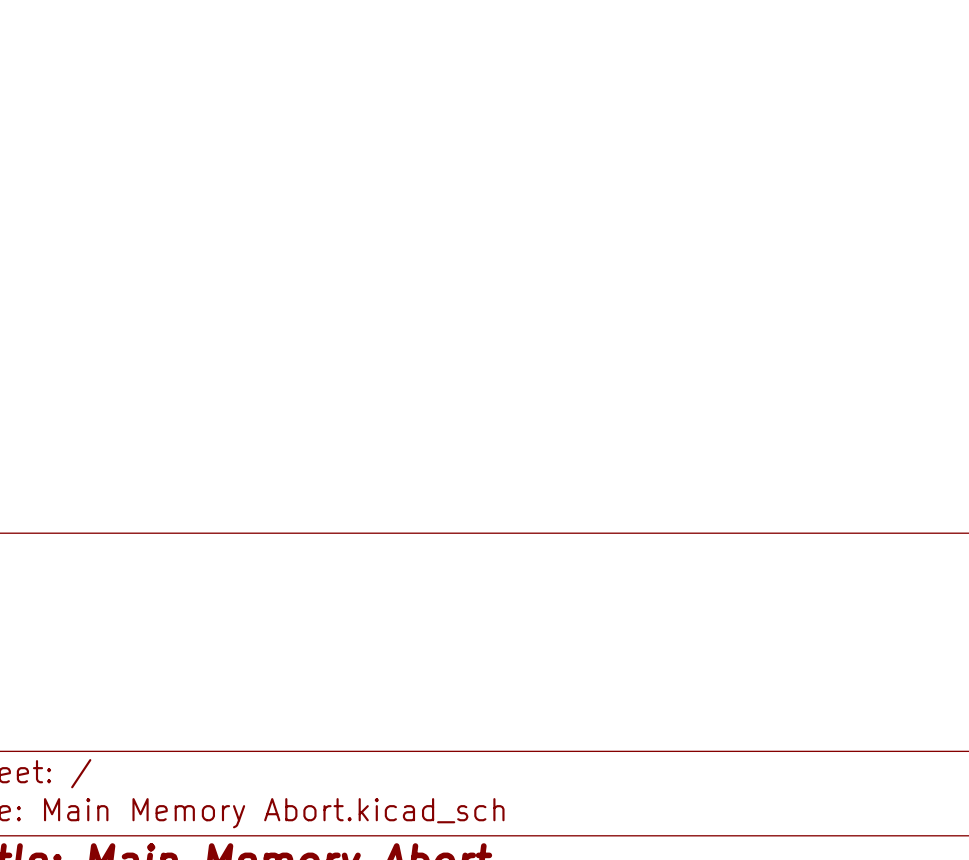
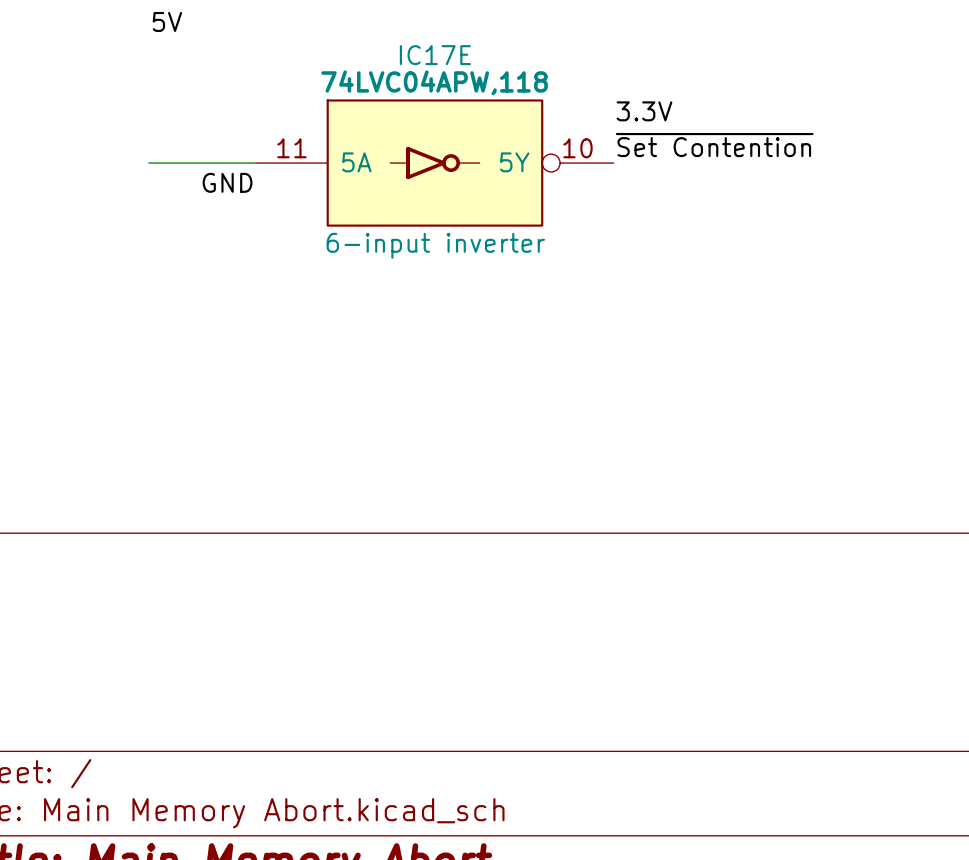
label: none -> 5V (167, 21)
label: none -> 3.3V (644, 111)
label: none -> ~{Set Contention} (714, 145)
wire: none -> (148, 163) (256, 163)
IC17E: none -> 74LVC04APW,118 (434, 163)
label: none -> GND (227, 182)

